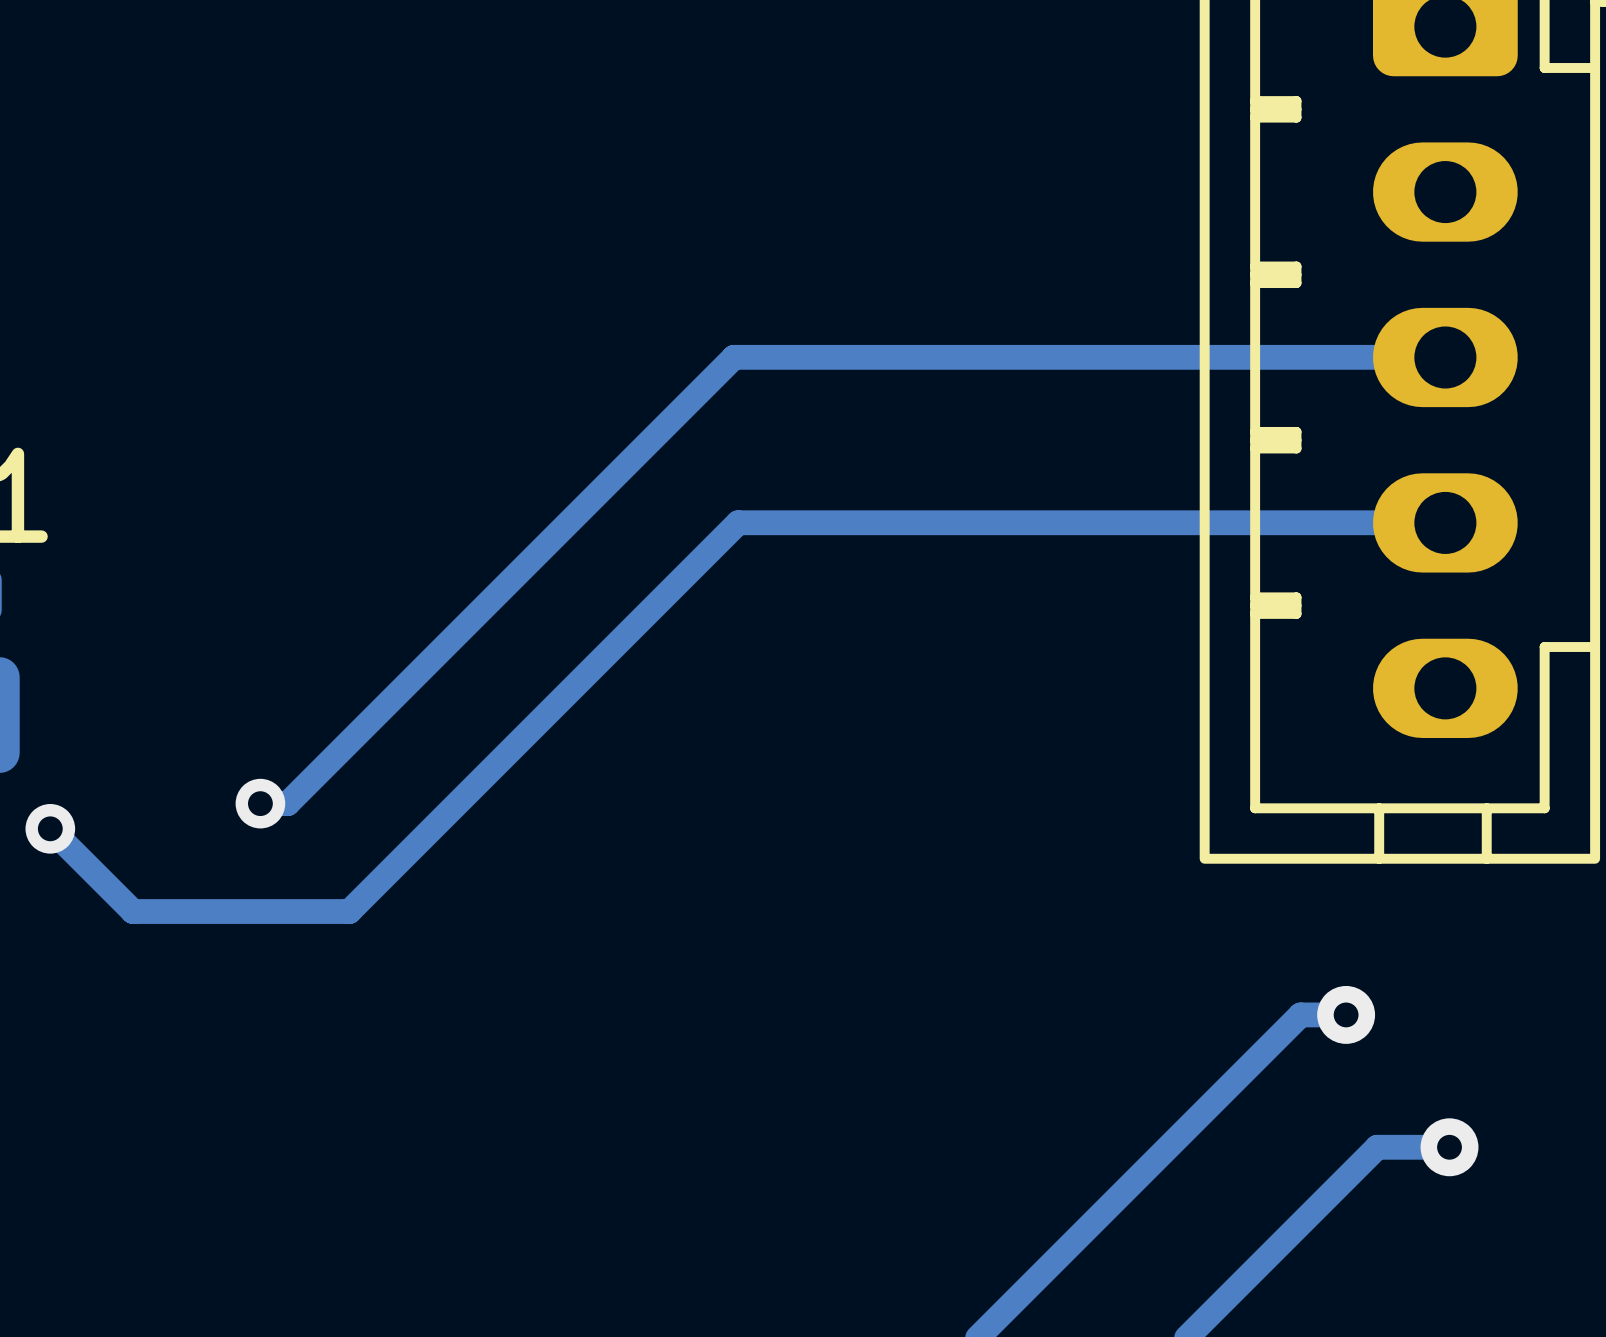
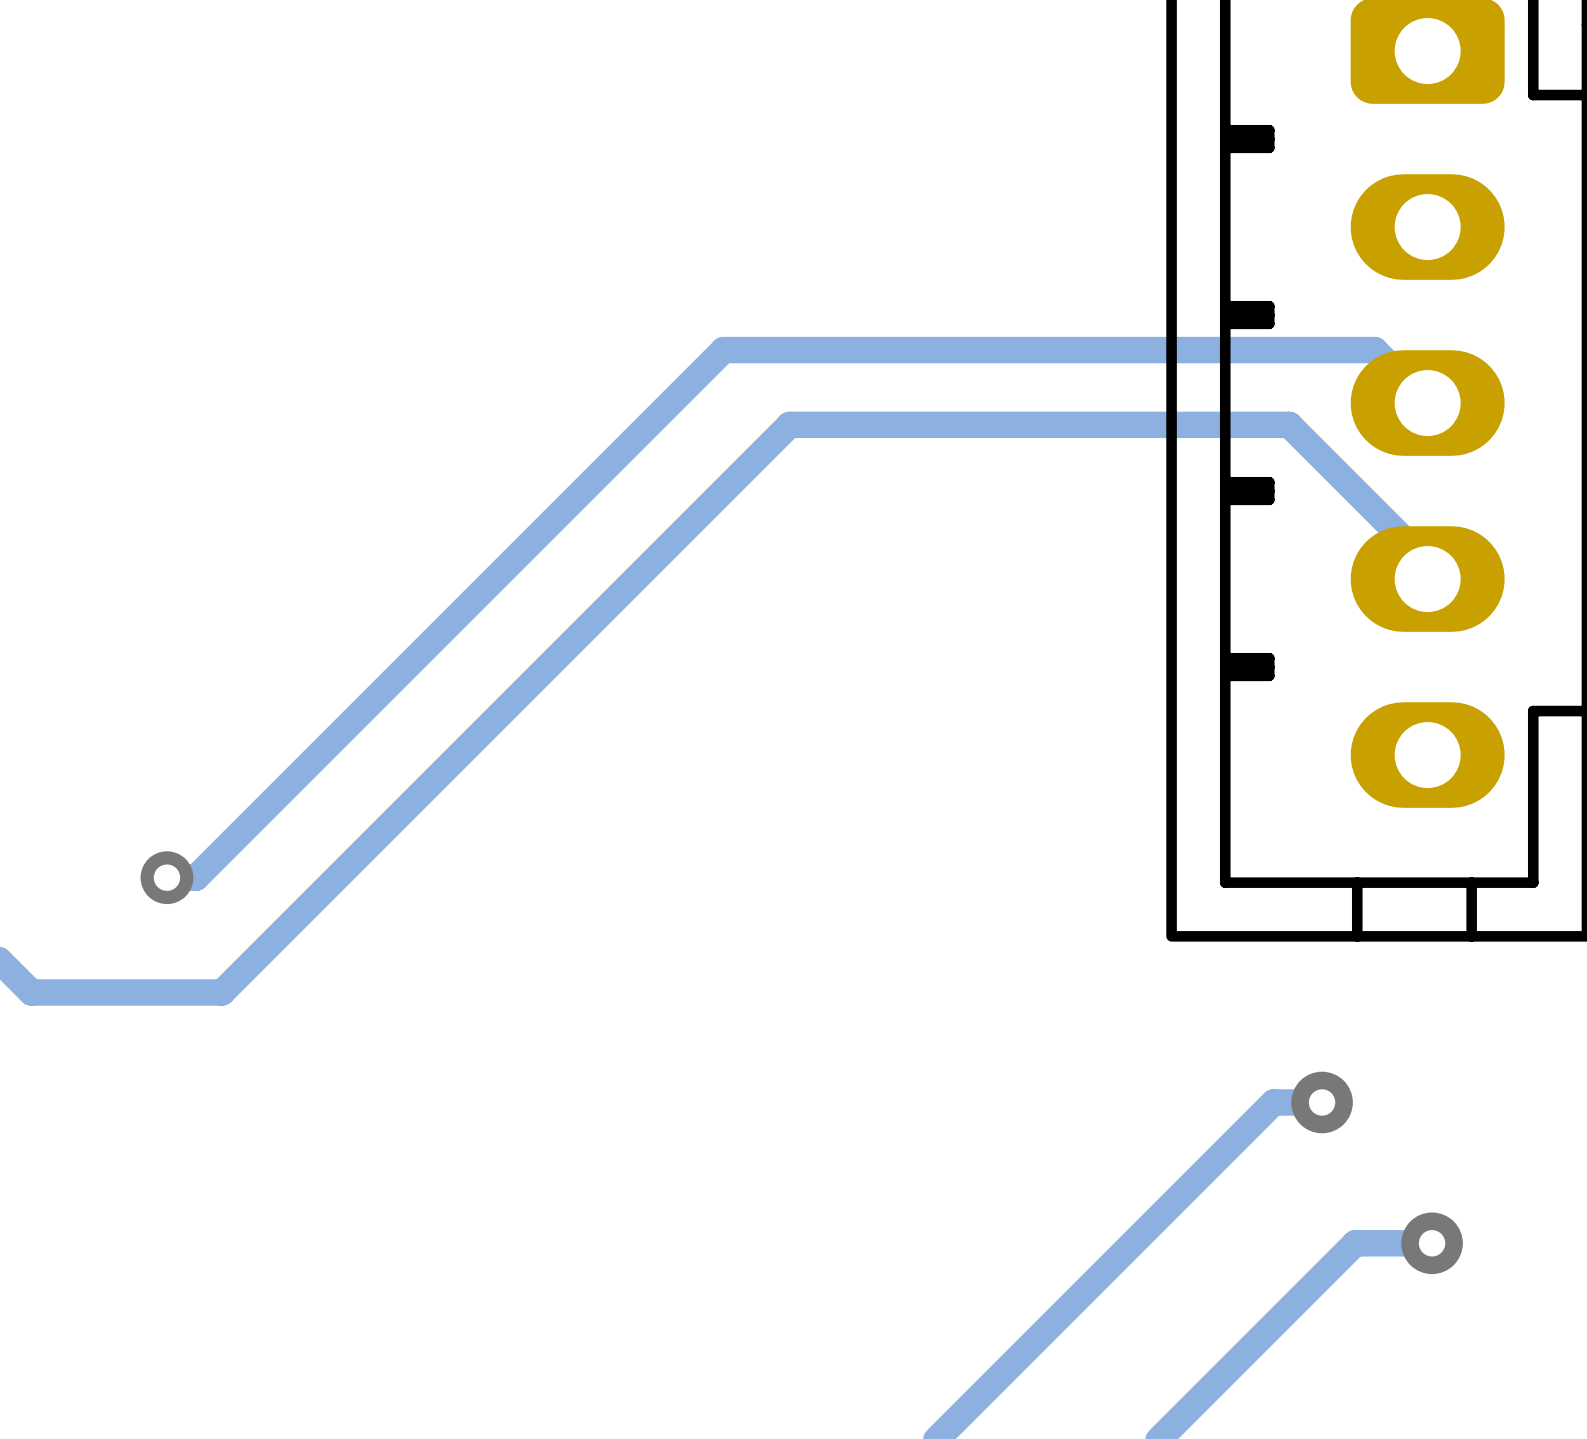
track: (1445, 357) (734, 357) -> (1427, 403) (1374, 350) (723, 350) (670, 402)
track: (1445, 508) (1430, 522) (738, 522) (349, 911) (312, 911) -> (1427, 563) (1289, 424) (789, 424) (222, 992)

